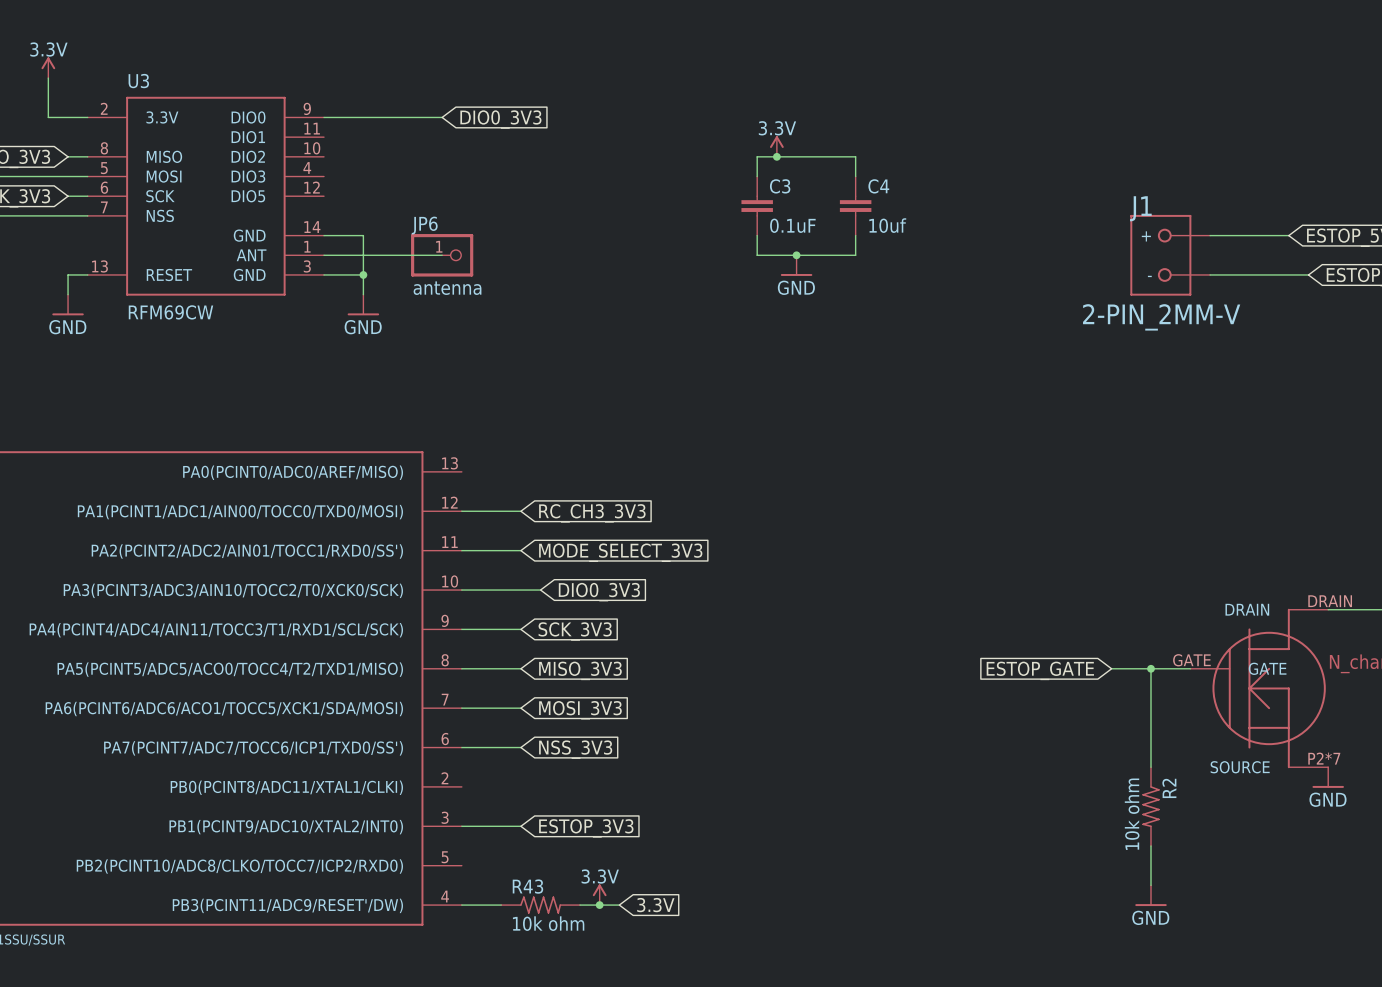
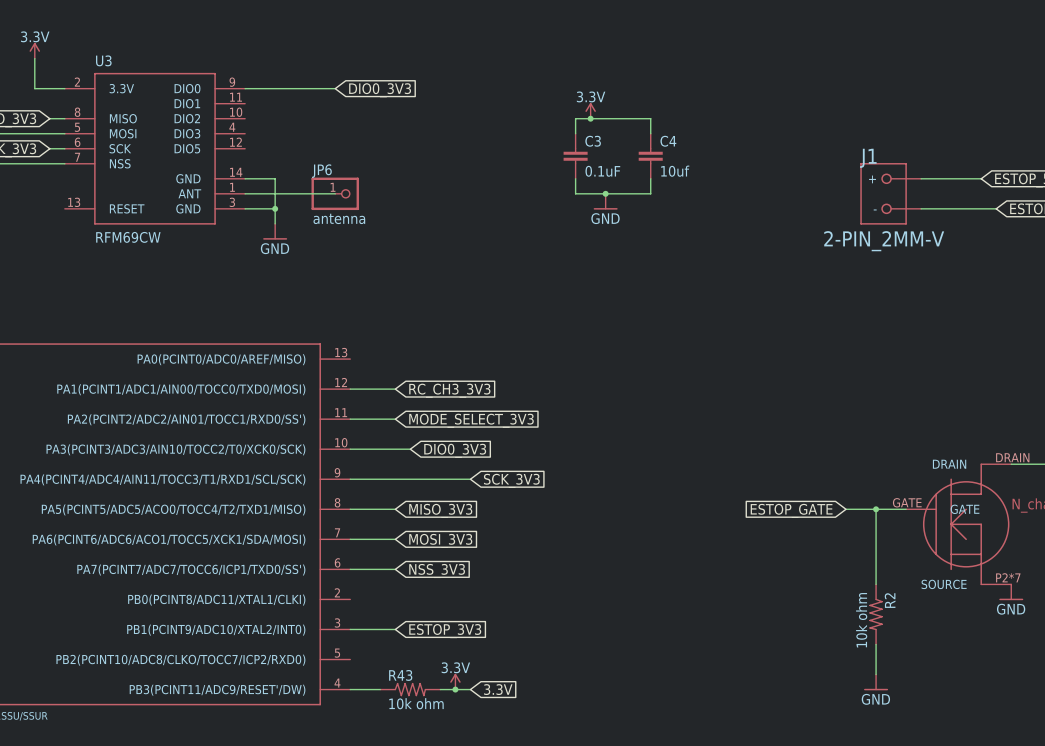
wire: (87, 274) (68, 274) (68, 294) -> none
power symbol: GND (68, 305) -> none
wire: none -> (395, 479) (470, 479)
global label position: SCK_3V3 (575, 631) -> SCK_3V3 (511, 480)

